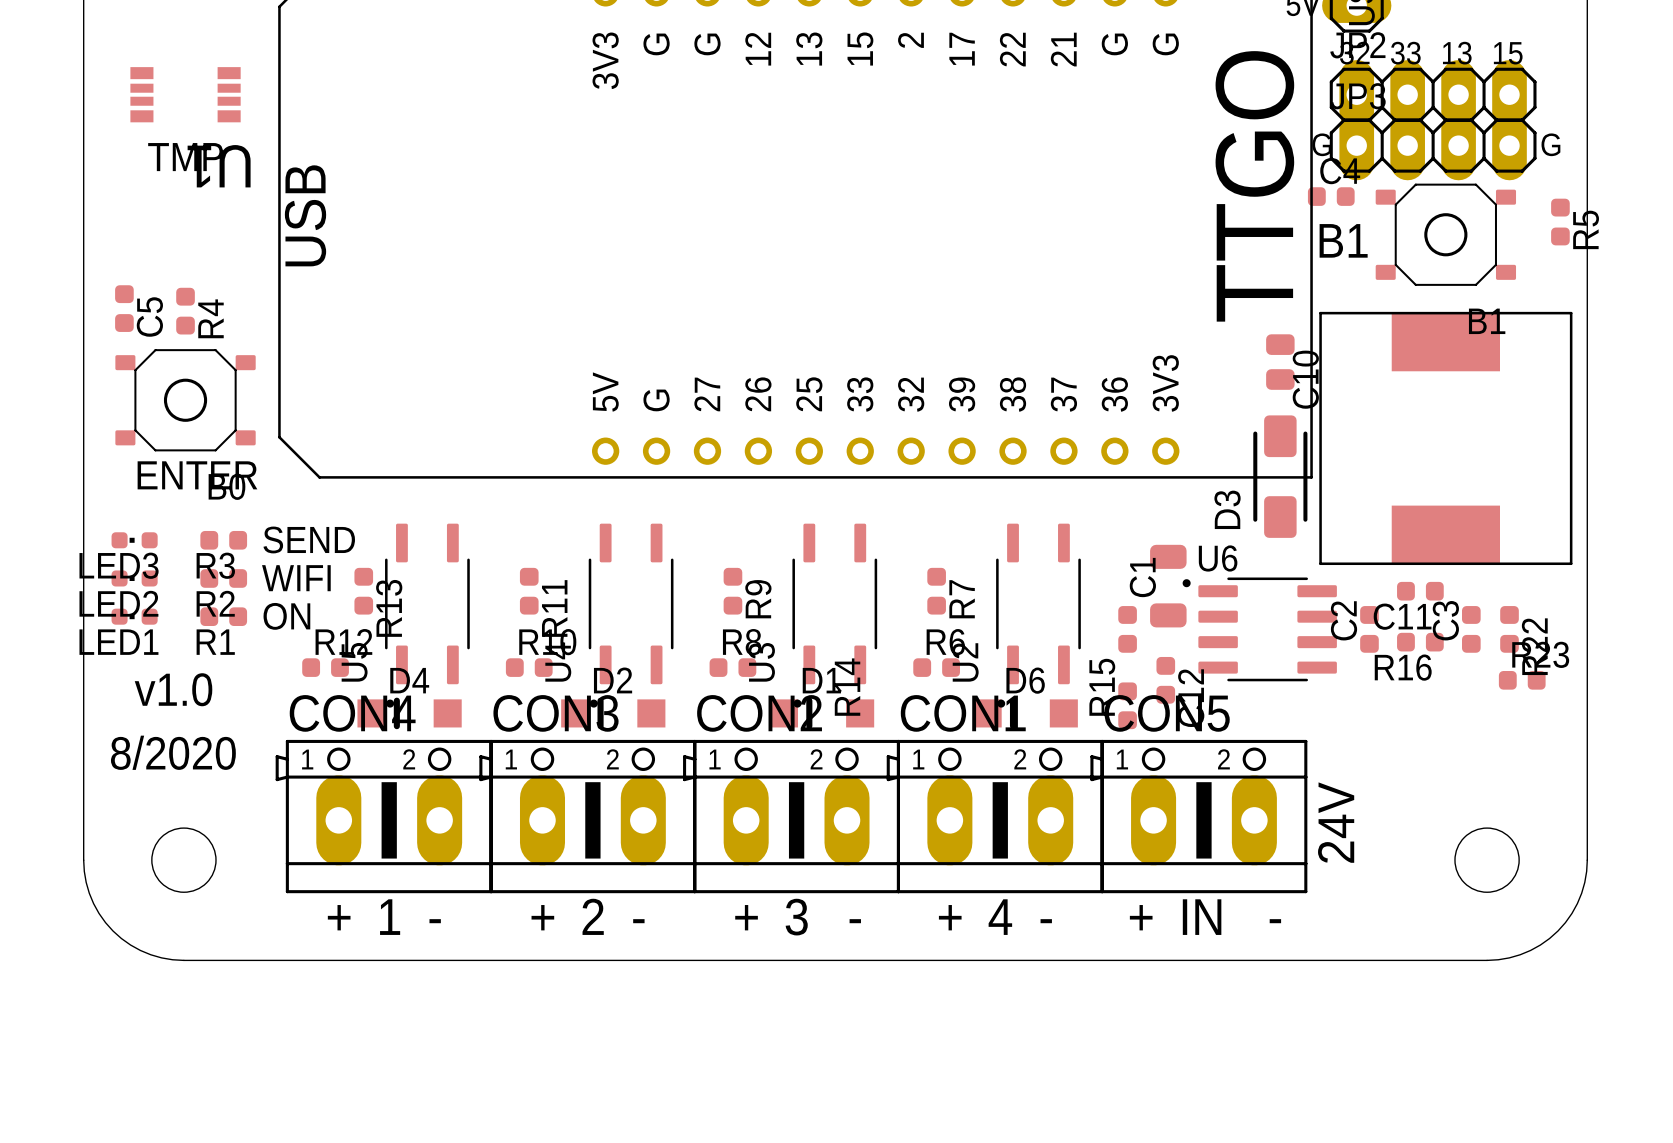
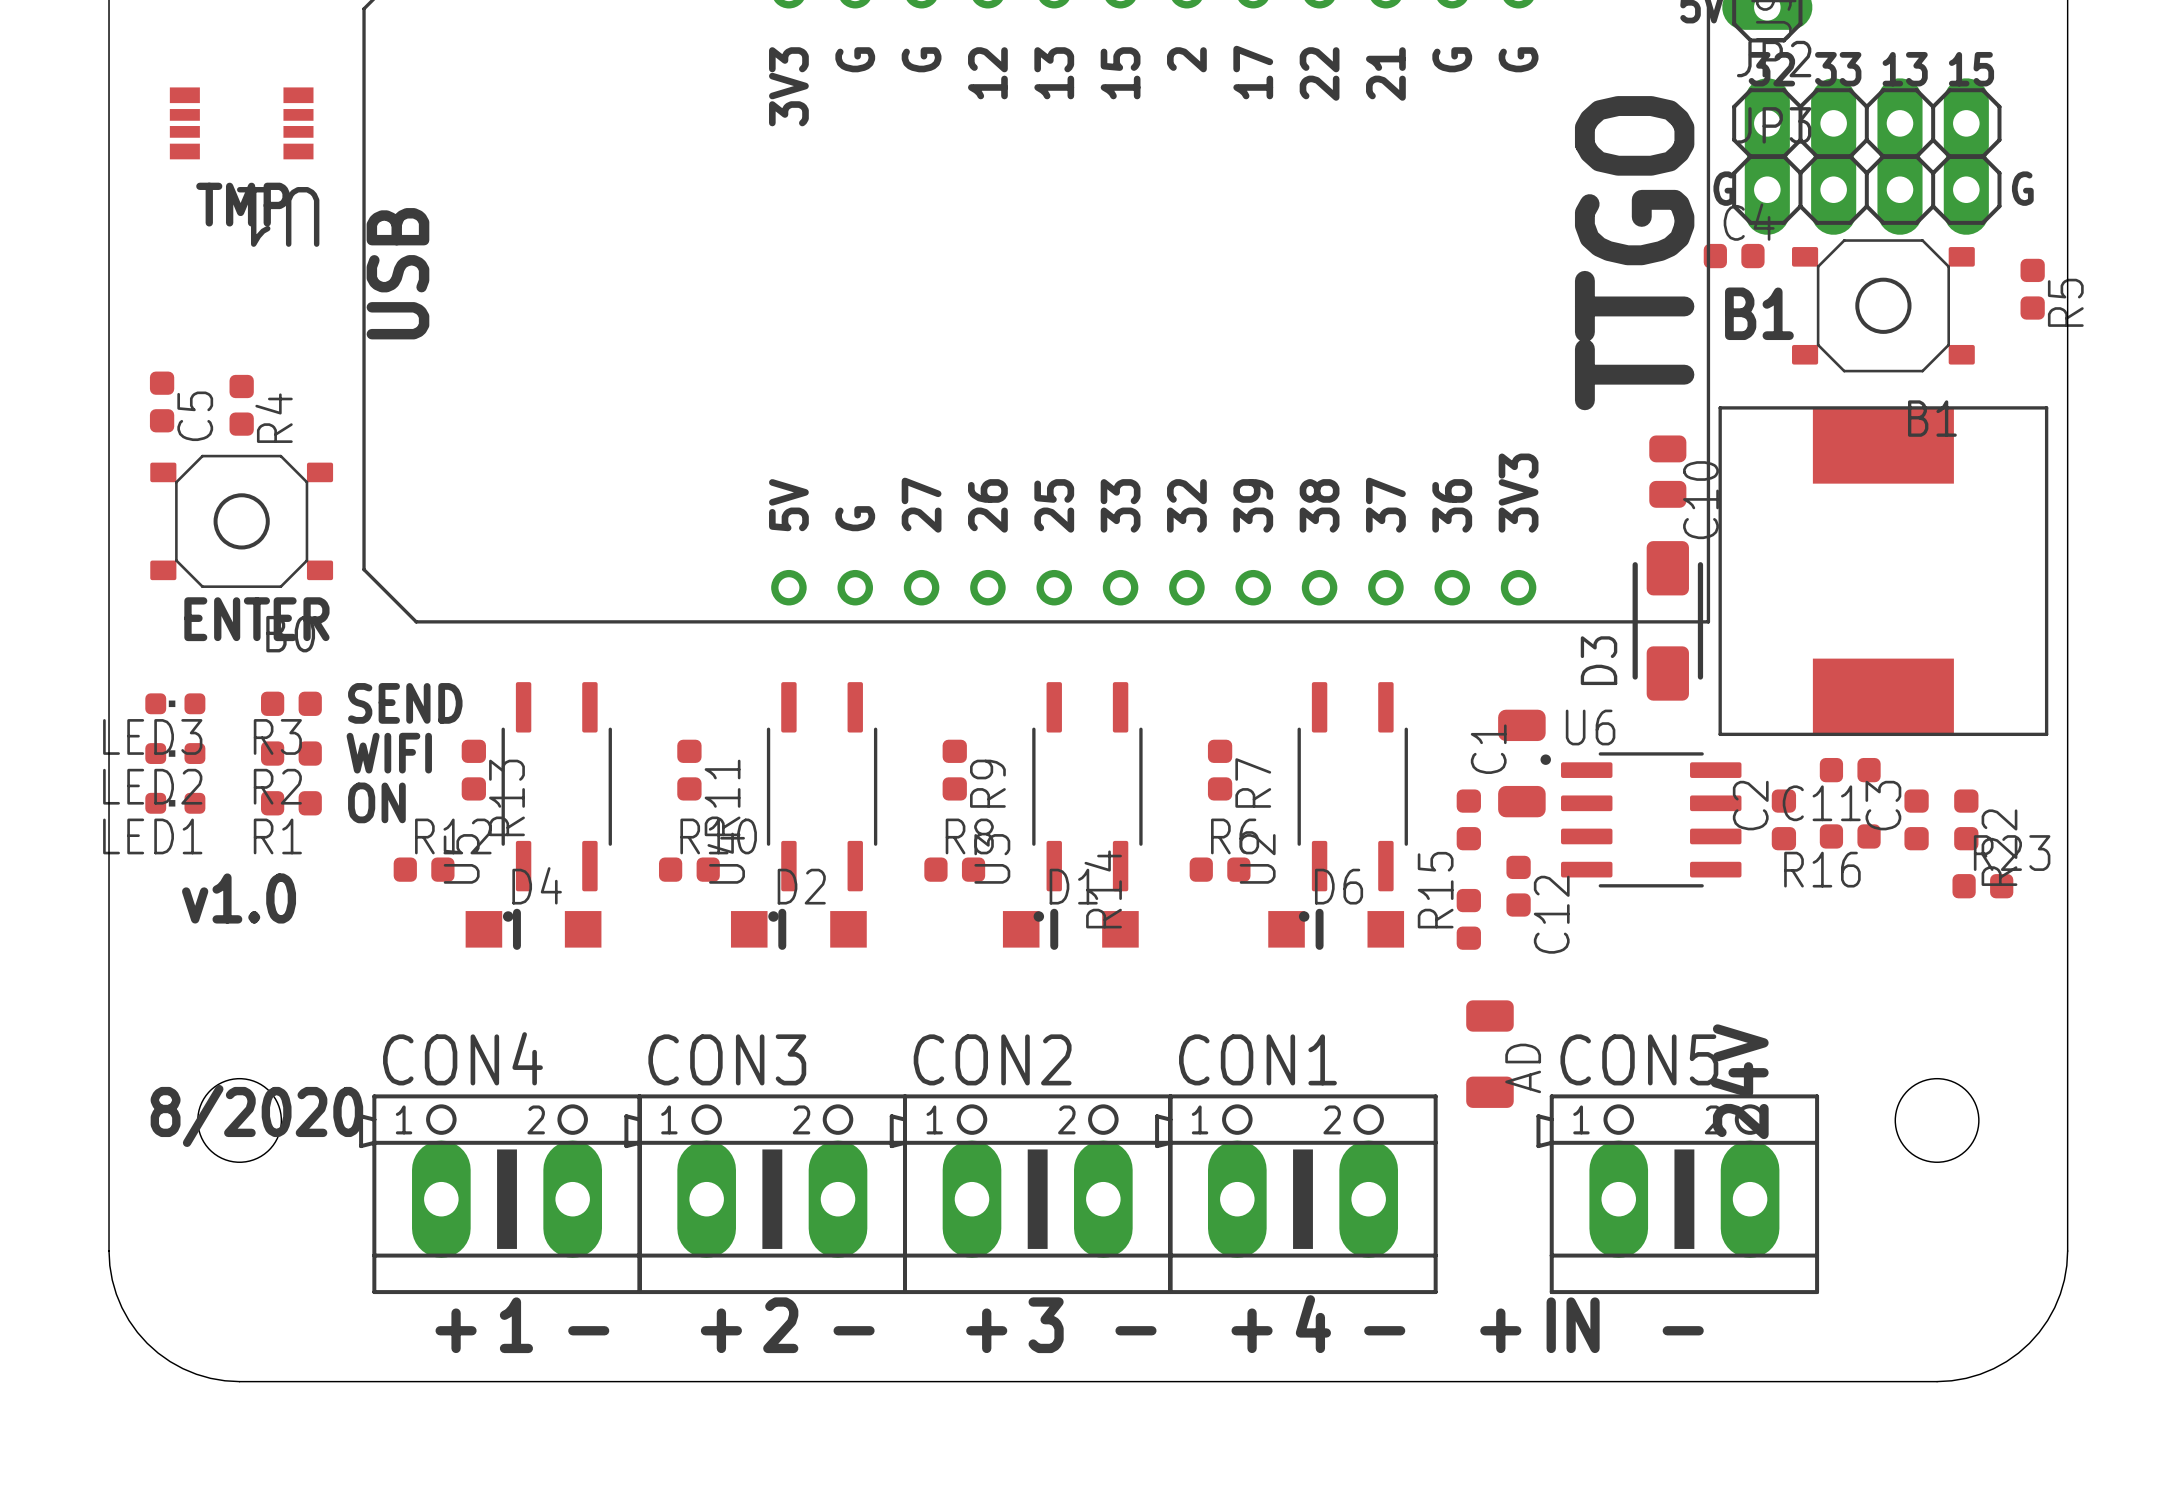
text position: 8/2020 (173, 752) -> 8/2020 (256, 1115)
AD: none -> (1489, 1054)
CON4 position: (384, 816) -> (500, 1194)
CON3 position: (587, 816) -> (765, 1194)
CON2 position: (791, 816) -> (1031, 1194)
CON1 position: (995, 816) -> (1296, 1194)
CON5 position: (1198, 816) -> (1677, 1194)
board edge: (83, 860) (89, 893) (99, 913) (113, 931) (130, 945) (150, 954) (183, 960) (1498, 959) (1520, 954) (1540, 945) (1565, 922) (1581, 893) (1587, 860) -> (109, 1120) (109, 1265) (116, 1294) (121, 1307) (137, 1332) (158, 1353) (170, 1361) (196, 1374) (224, 1380) (239, 1381) (1951, 1380) (1980, 1374) (2006, 1361) (2018, 1353) (2039, 1332) (2054, 1307) (2060, 1294) (2066, 1265) (2067, 1120)
text position: 2 (593, 916) -> 2 (780, 1325)
text position: + (339, 917) -> + (456, 1330)
text position: 1 (390, 917) -> 1 (516, 1325)
text position: + (542, 917) -> + (721, 1330)
text position: + (746, 917) -> + (986, 1330)
text position: 3 (796, 917) -> 3 (1046, 1325)
text position: + (950, 917) -> + (1252, 1330)
text position: 4 (1000, 917) -> 4 (1313, 1324)
text position: + (1141, 917) -> + (1500, 1330)
text position: IN (1202, 917) -> IN (1573, 1325)
text position: - (435, 921) -> - (588, 1330)
text position: - (638, 921) -> - (854, 1330)
text position: - (855, 921) -> - (1135, 1330)
text position: - (1046, 921) -> - (1384, 1330)
text position: - (1275, 921) -> - (1683, 1330)

